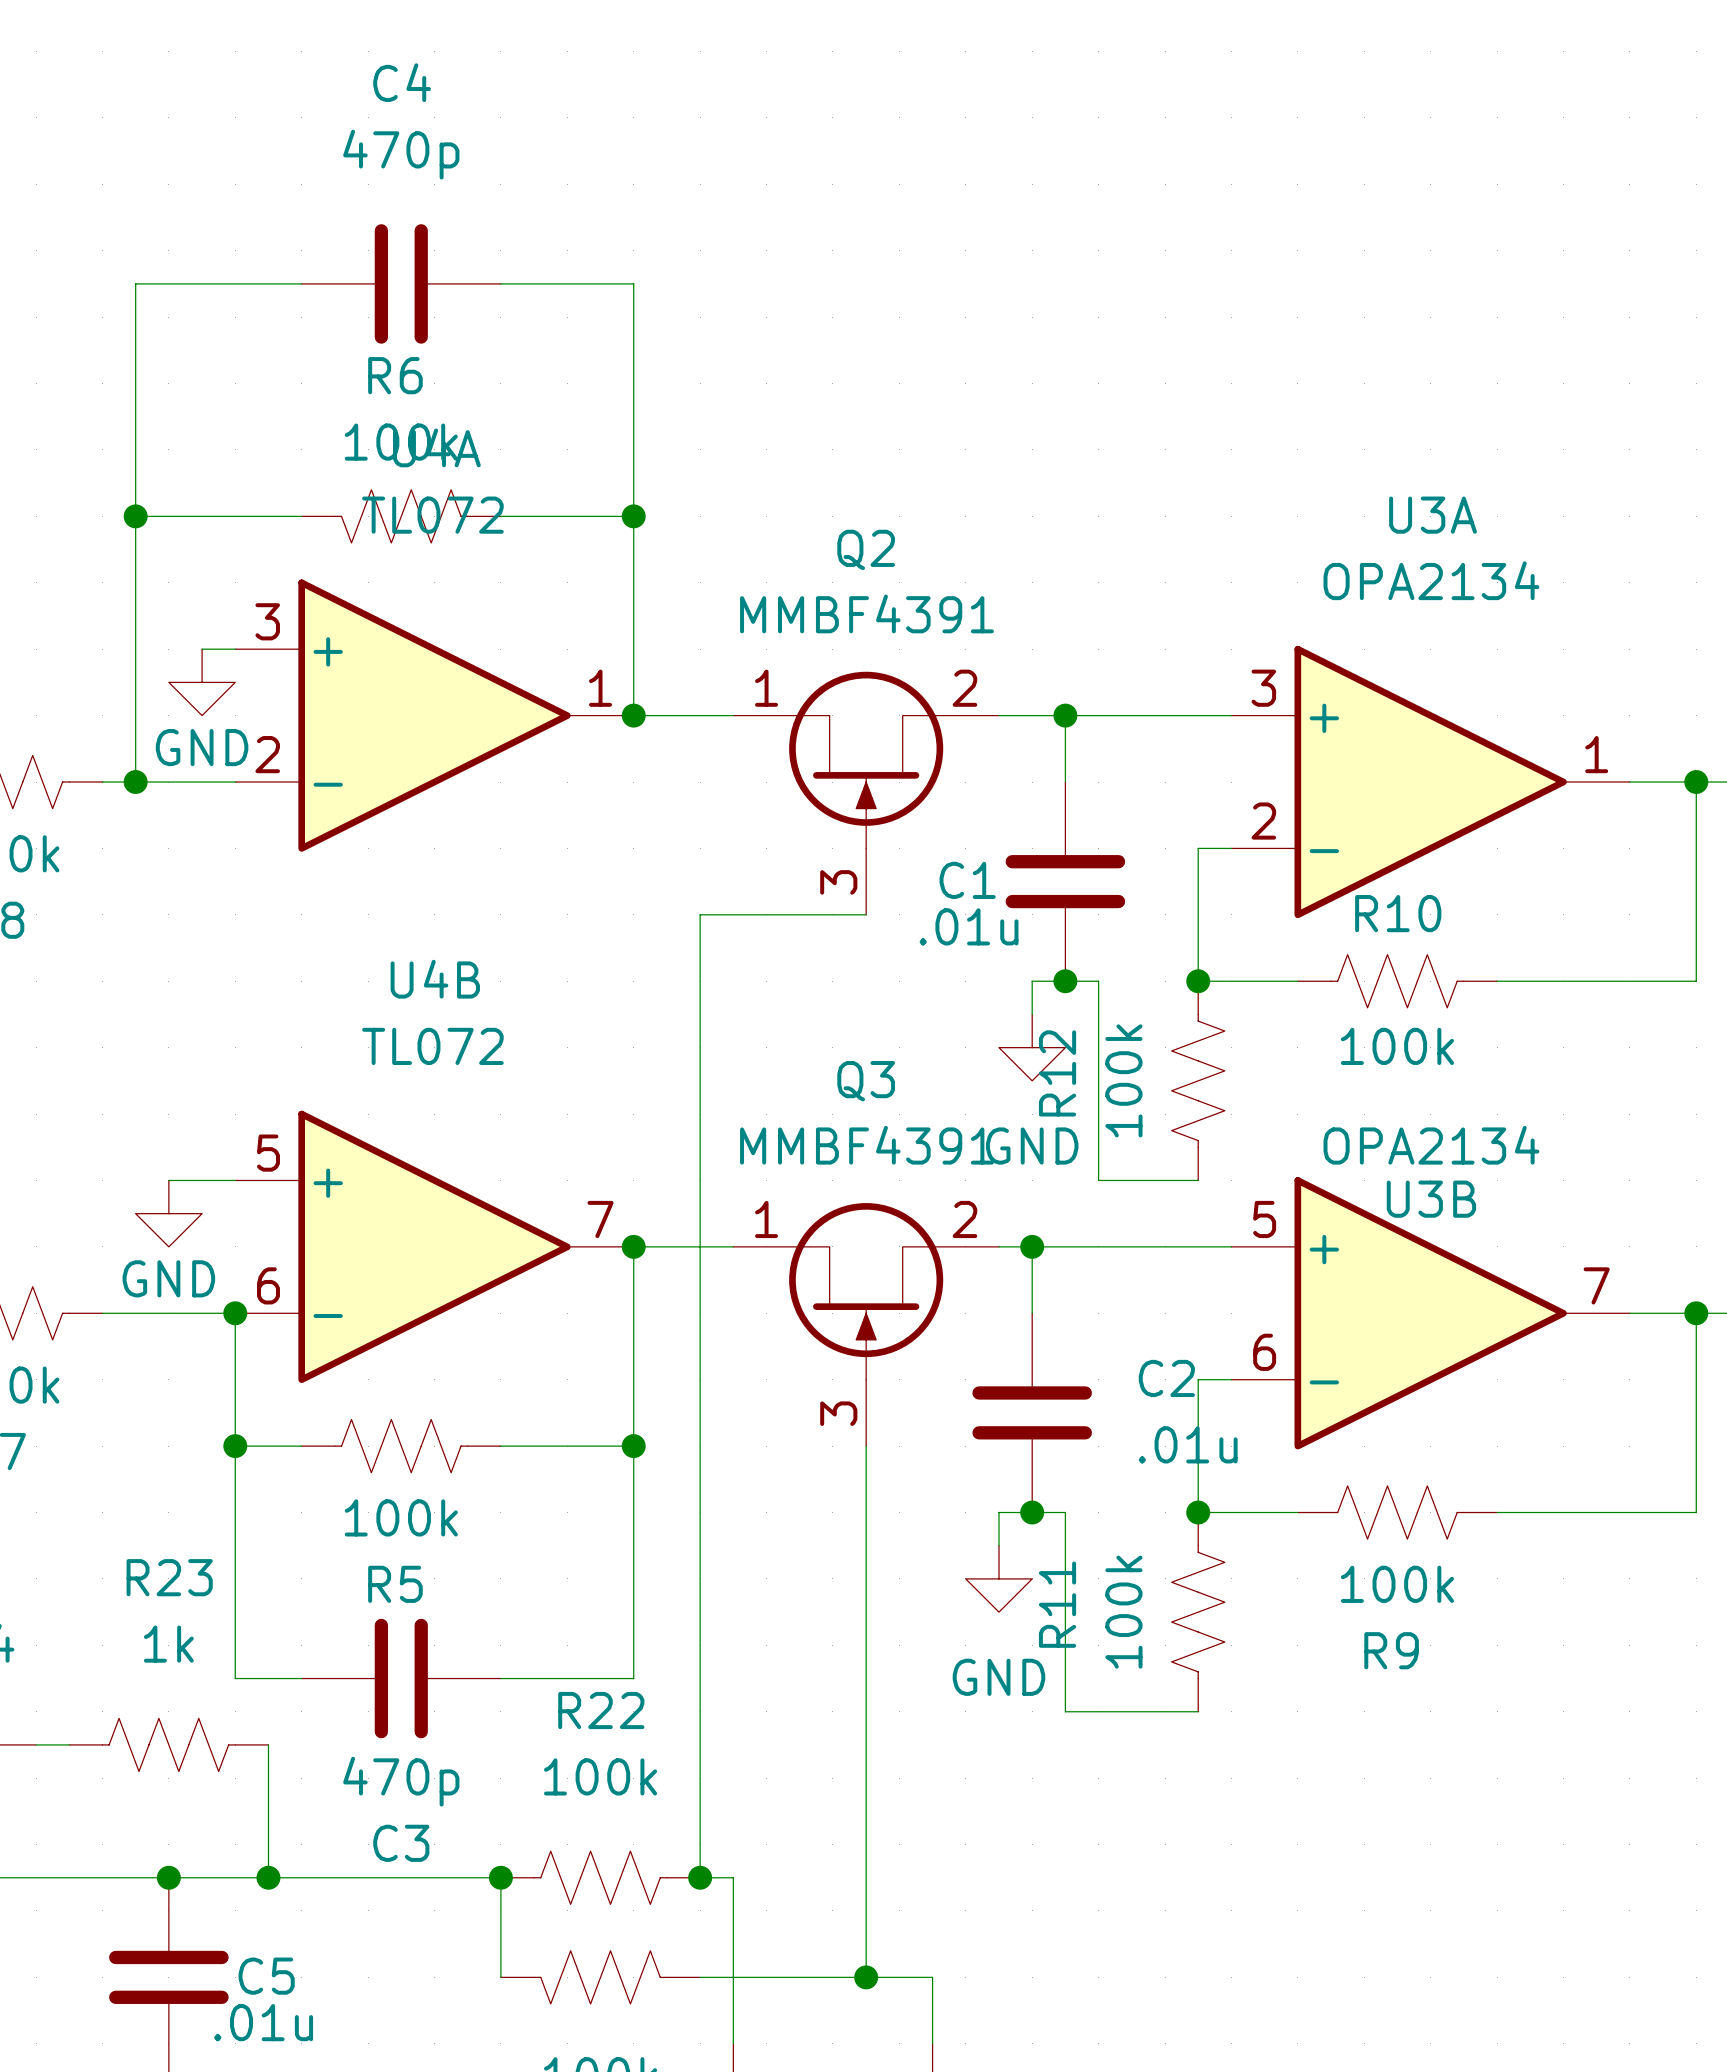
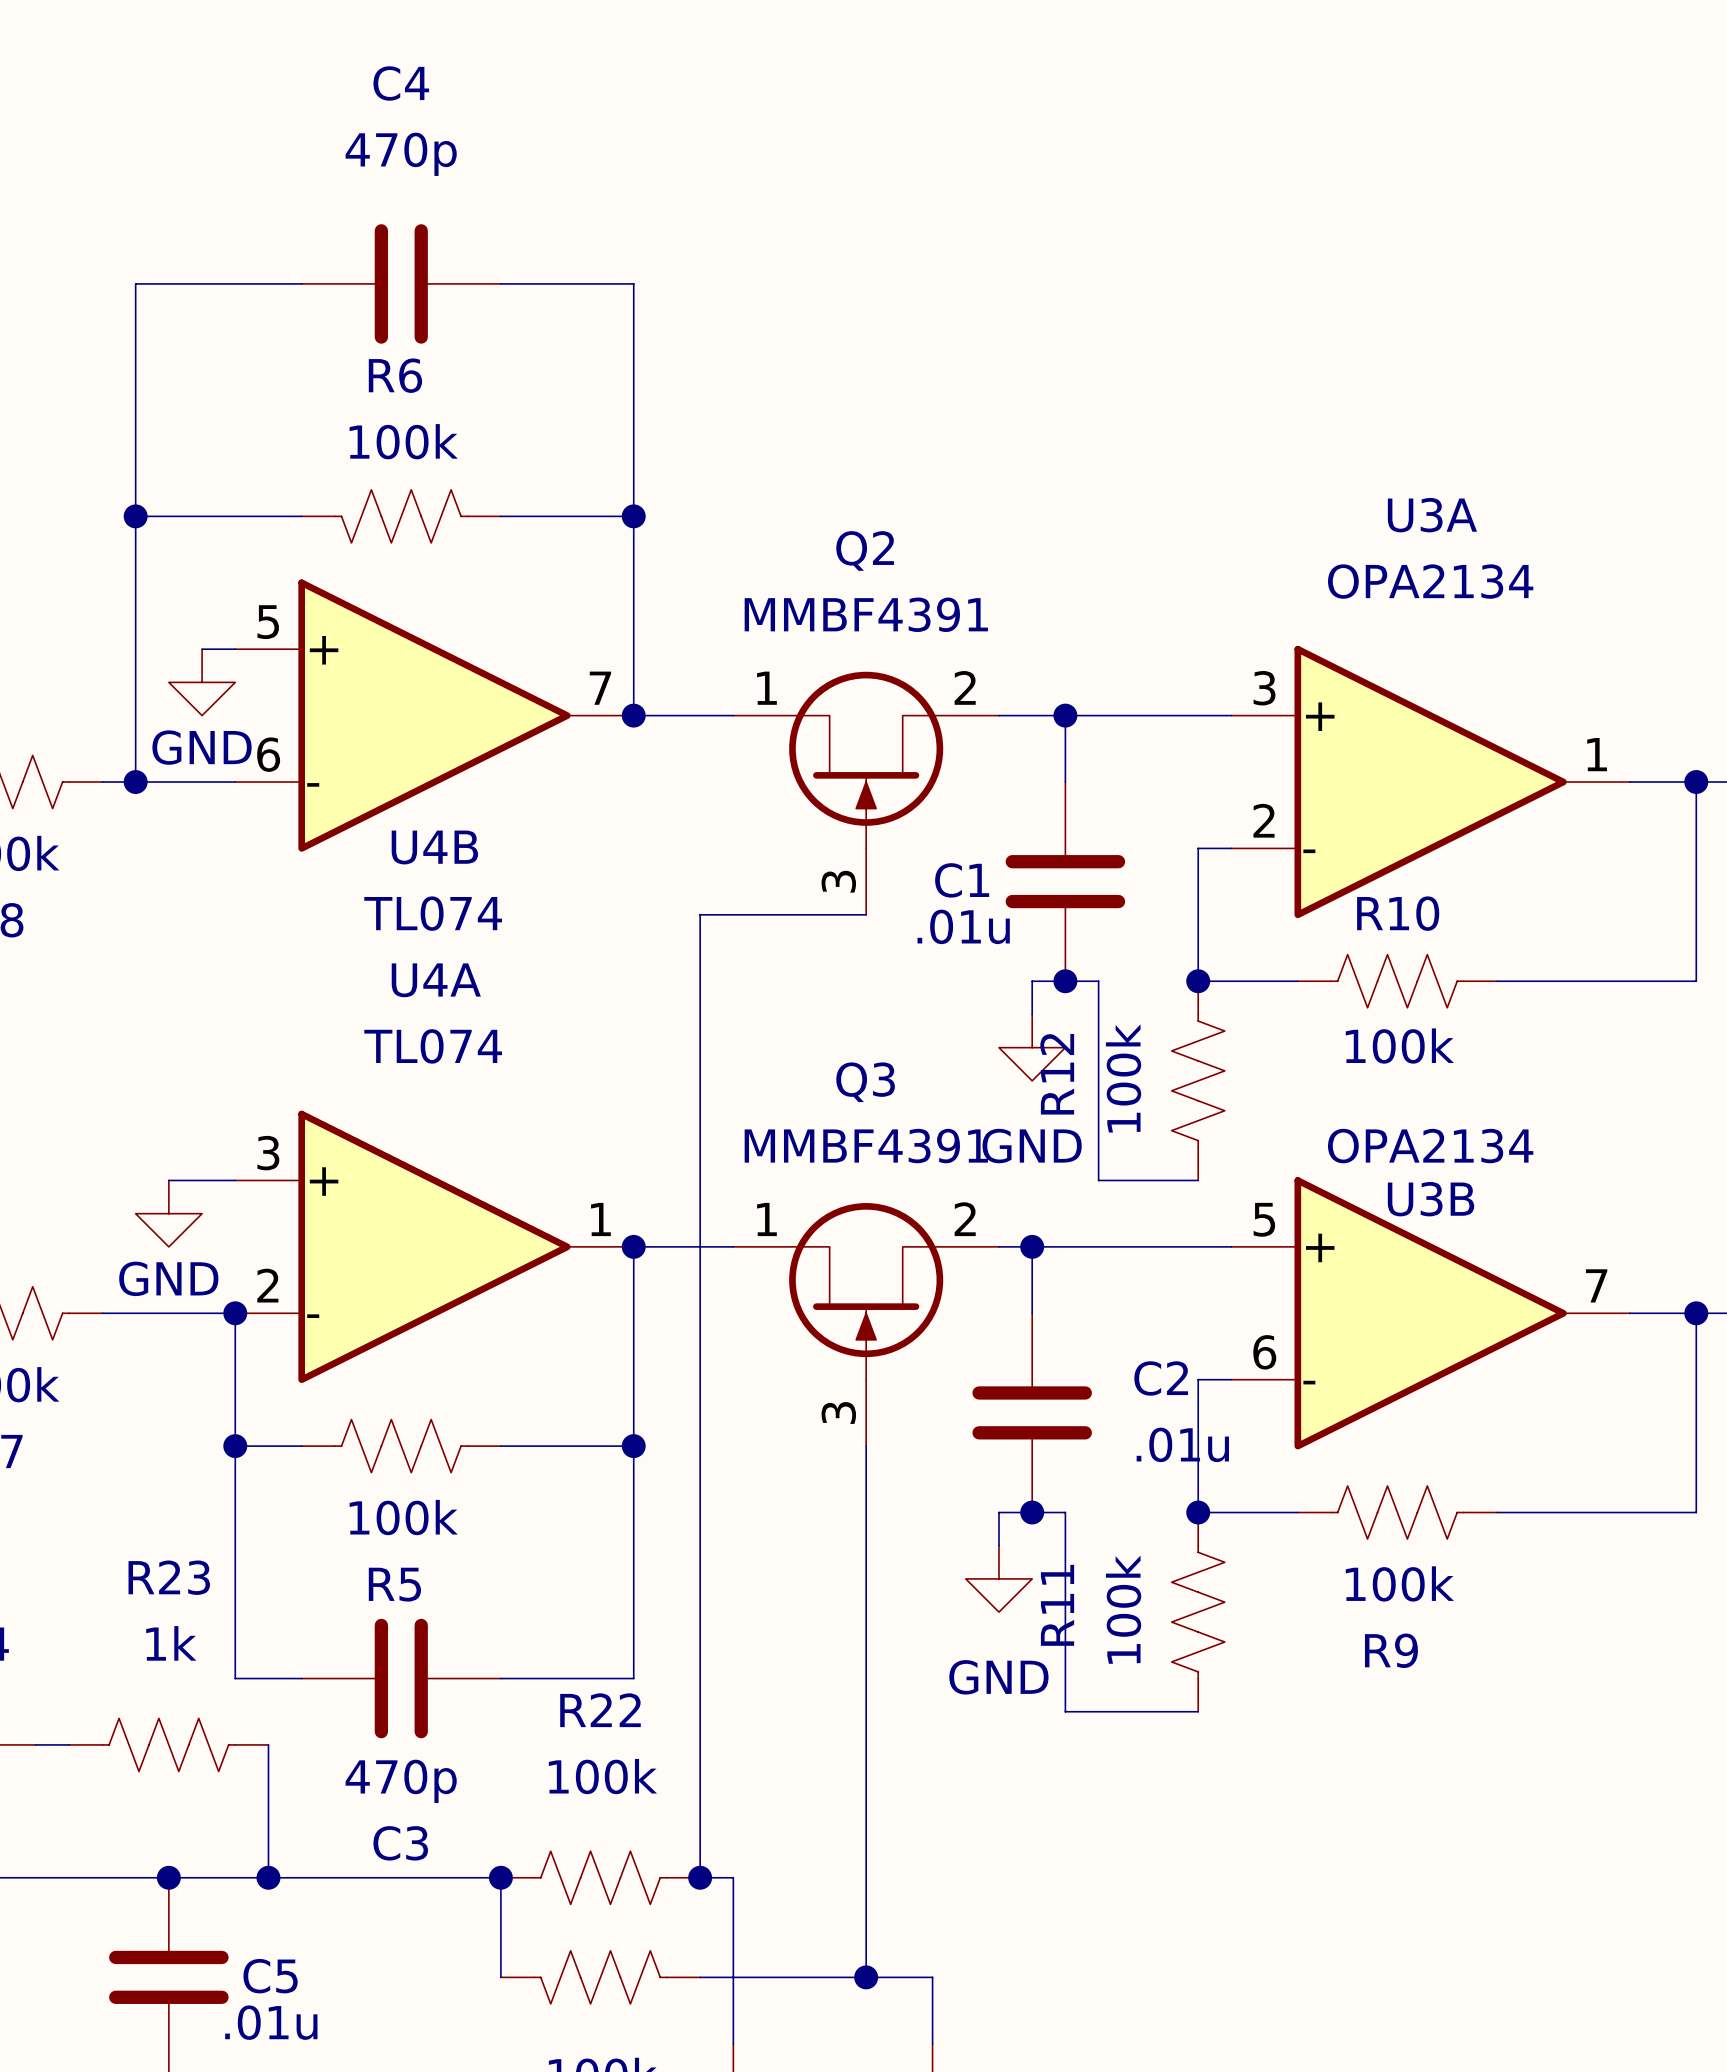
U4A value: TL072 (432, 515) -> TL074 (433, 1046)
U4A position: (434, 715) -> (434, 1246)
U4B name position: U4B (435, 979) -> U4B (434, 847)
U4B value: TL072 (432, 1046) -> TL074 (433, 913)
U4B position: (434, 1246) -> (434, 715)

